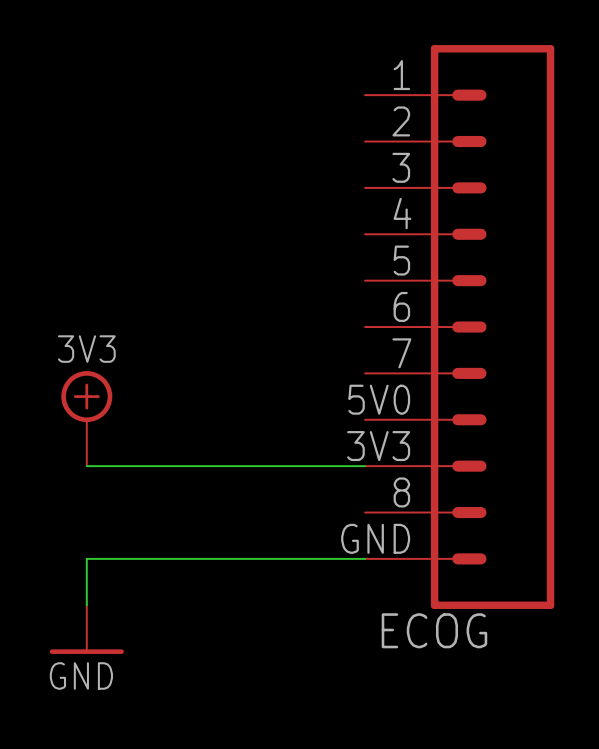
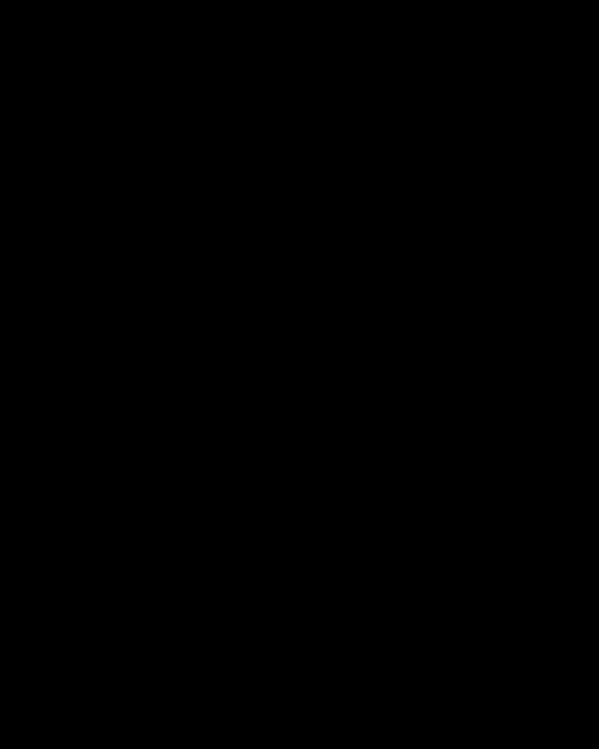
ECOG: (459, 327) -> none
power symbol: 3V3 (86, 418) -> none
wire: (86, 466) (365, 466) -> none
wire: (365, 558) (86, 558) (86, 605) -> none
power symbol: GND (86, 629) -> none

